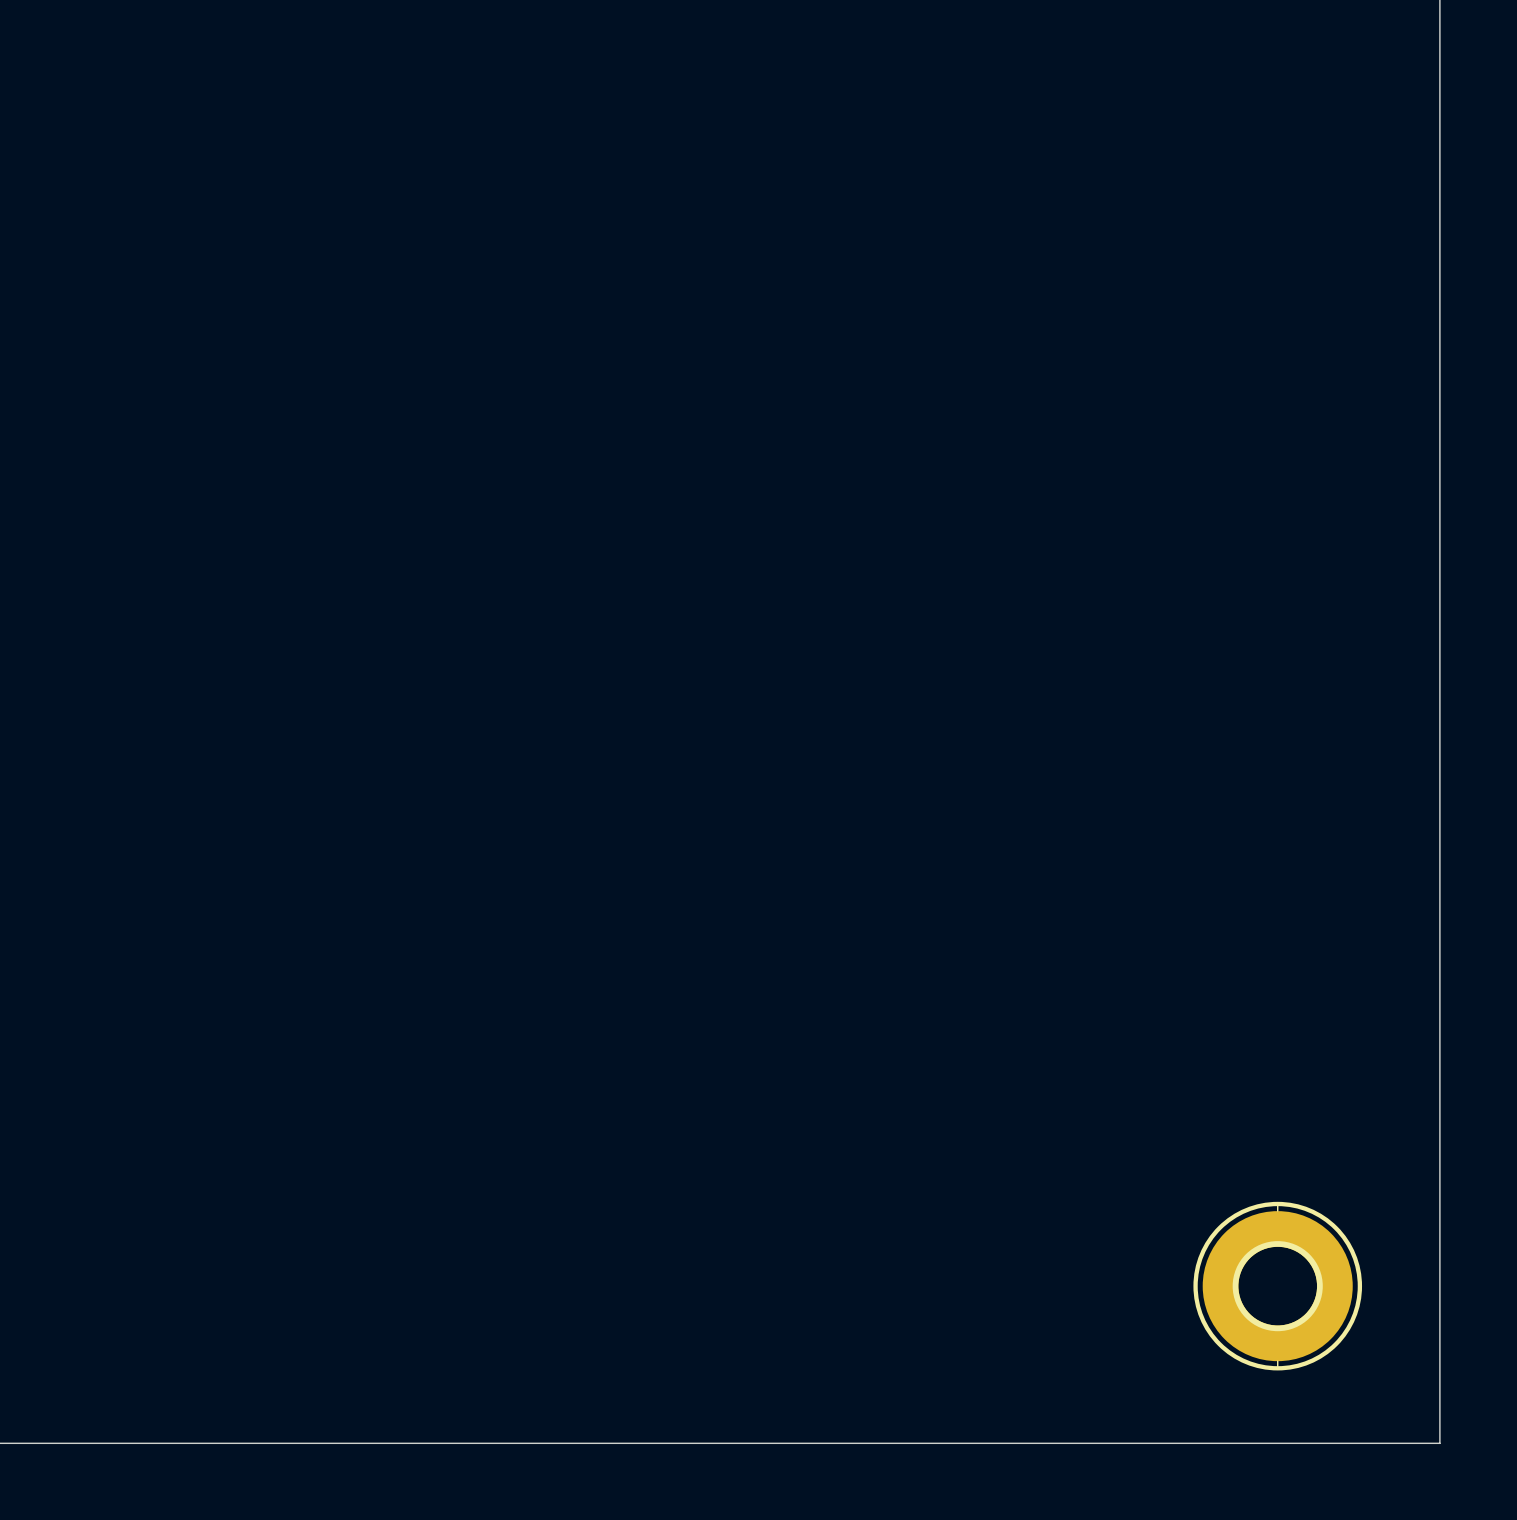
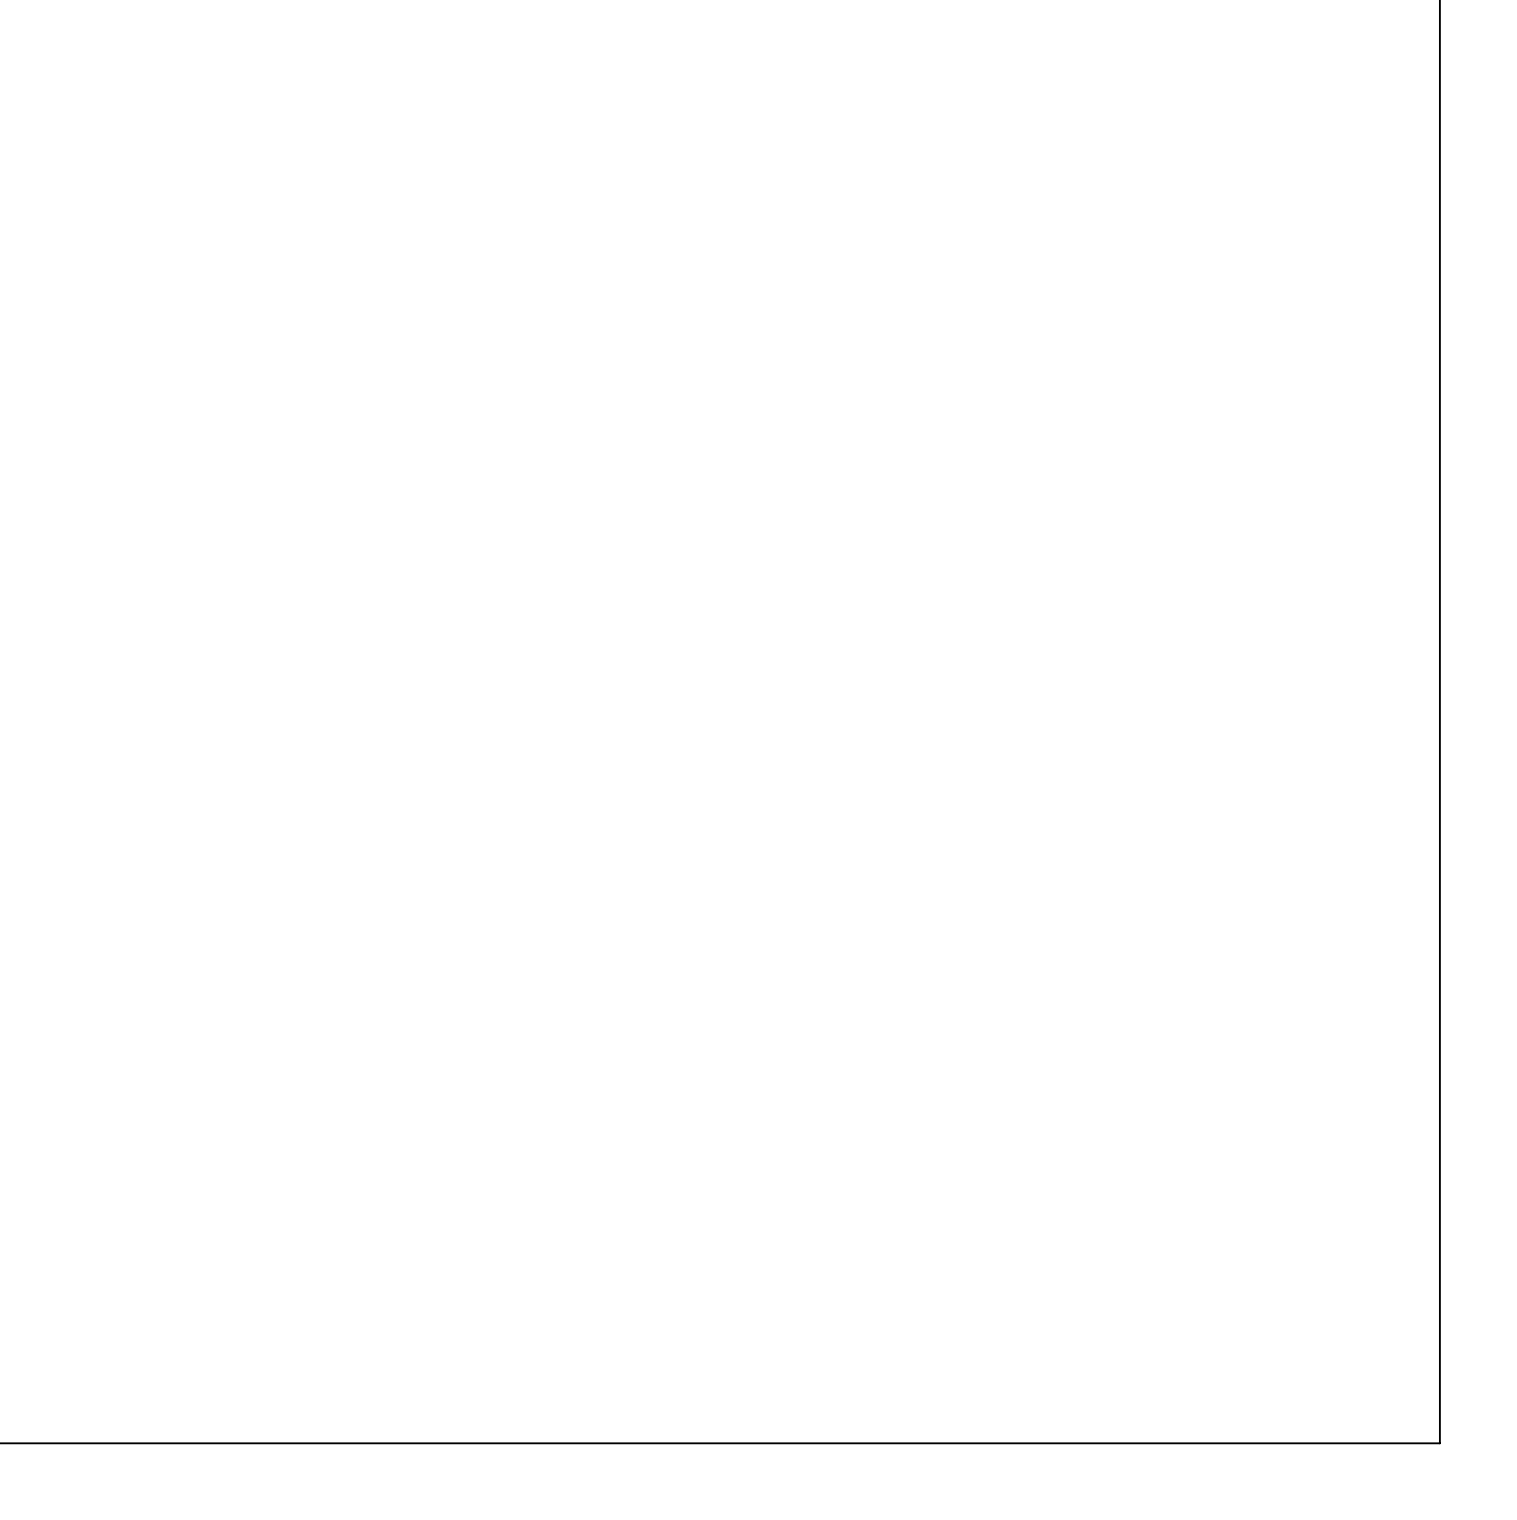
part: (1277, 1286) -> none

